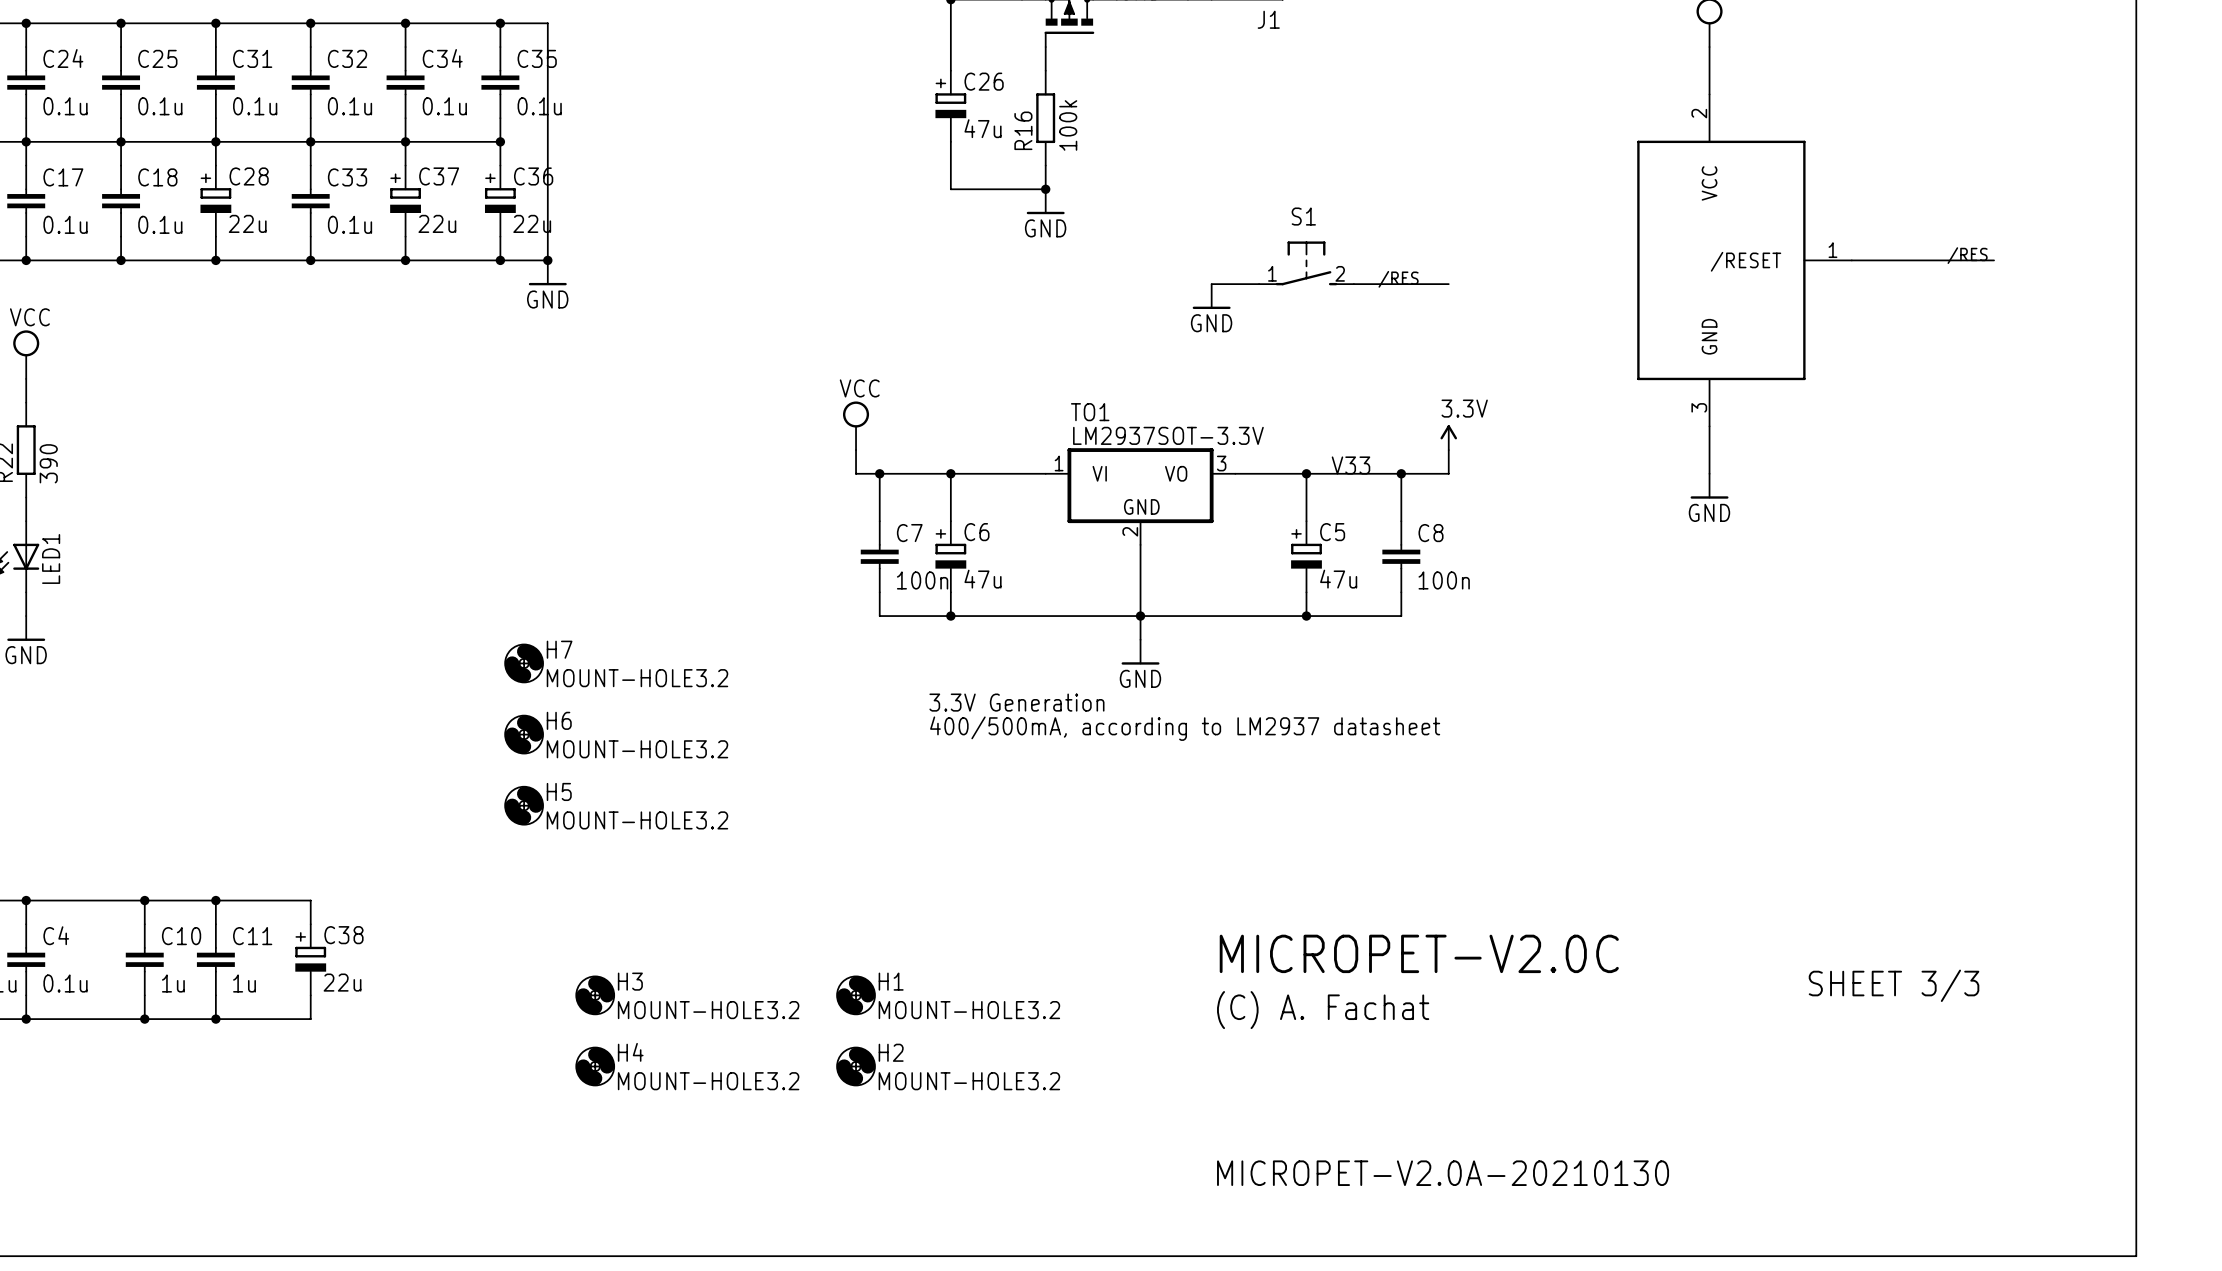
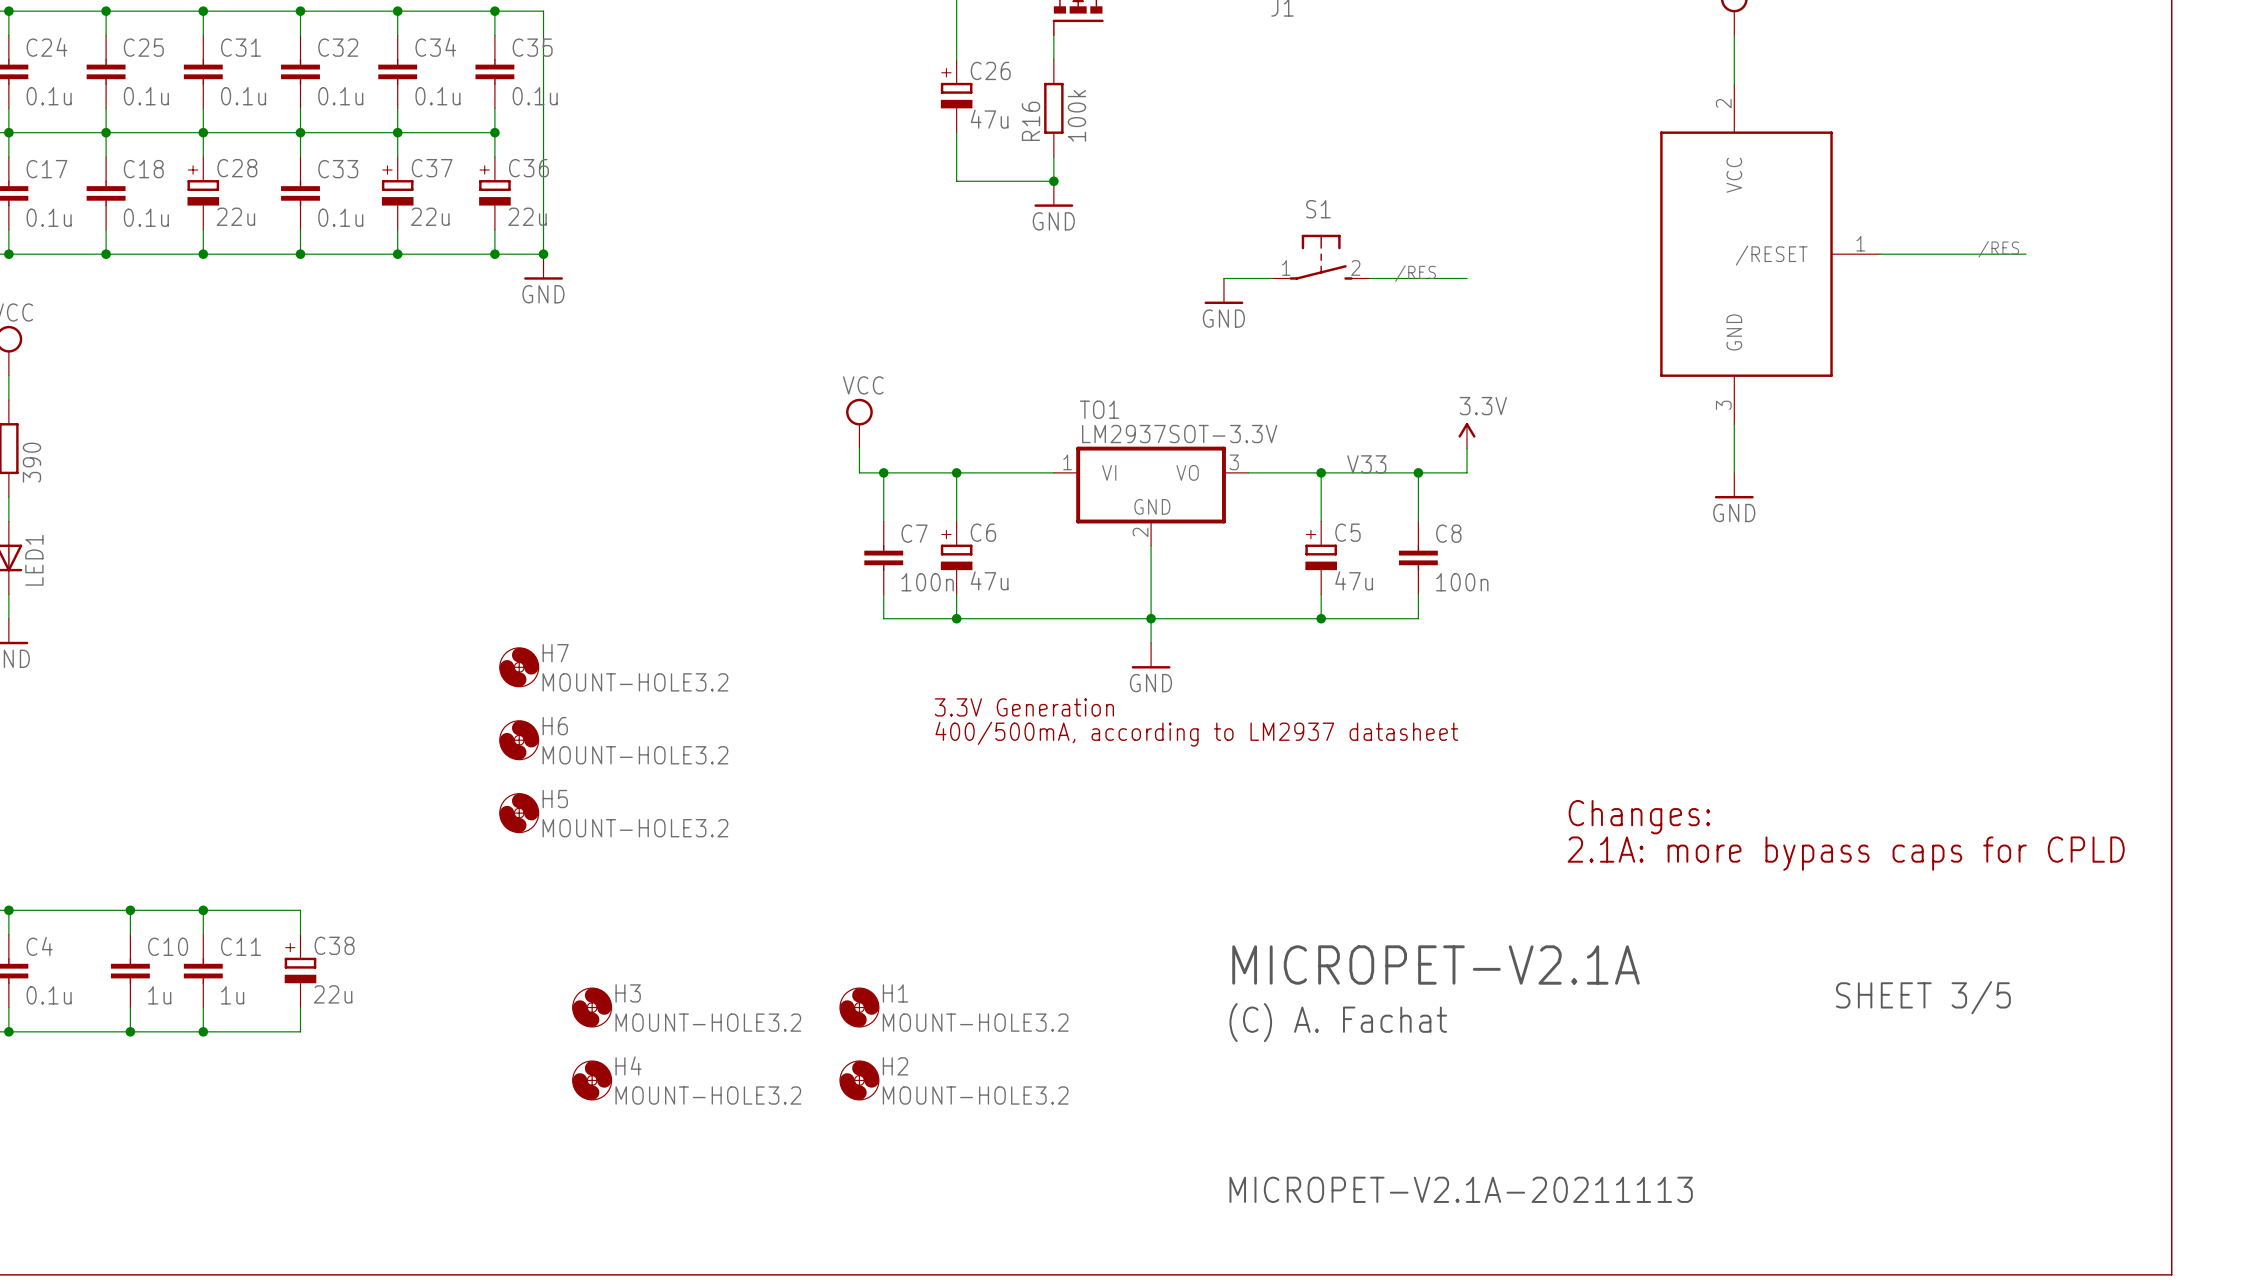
text: none -> Changes: (1639, 817)
text: none -> 2.1A: more bypass caps for CPLD (1846, 853)
text: MICROPET-V2.0C (1419, 953) -> MICROPET-V2.1A (1436, 965)
text: SHEET 3/3 (1894, 985) -> SHEET 3/5 (1923, 997)
text: MICROPET-V2.0A-20210130 (1443, 1173) -> MICROPET-V2.1A-20211113 (1461, 1189)

